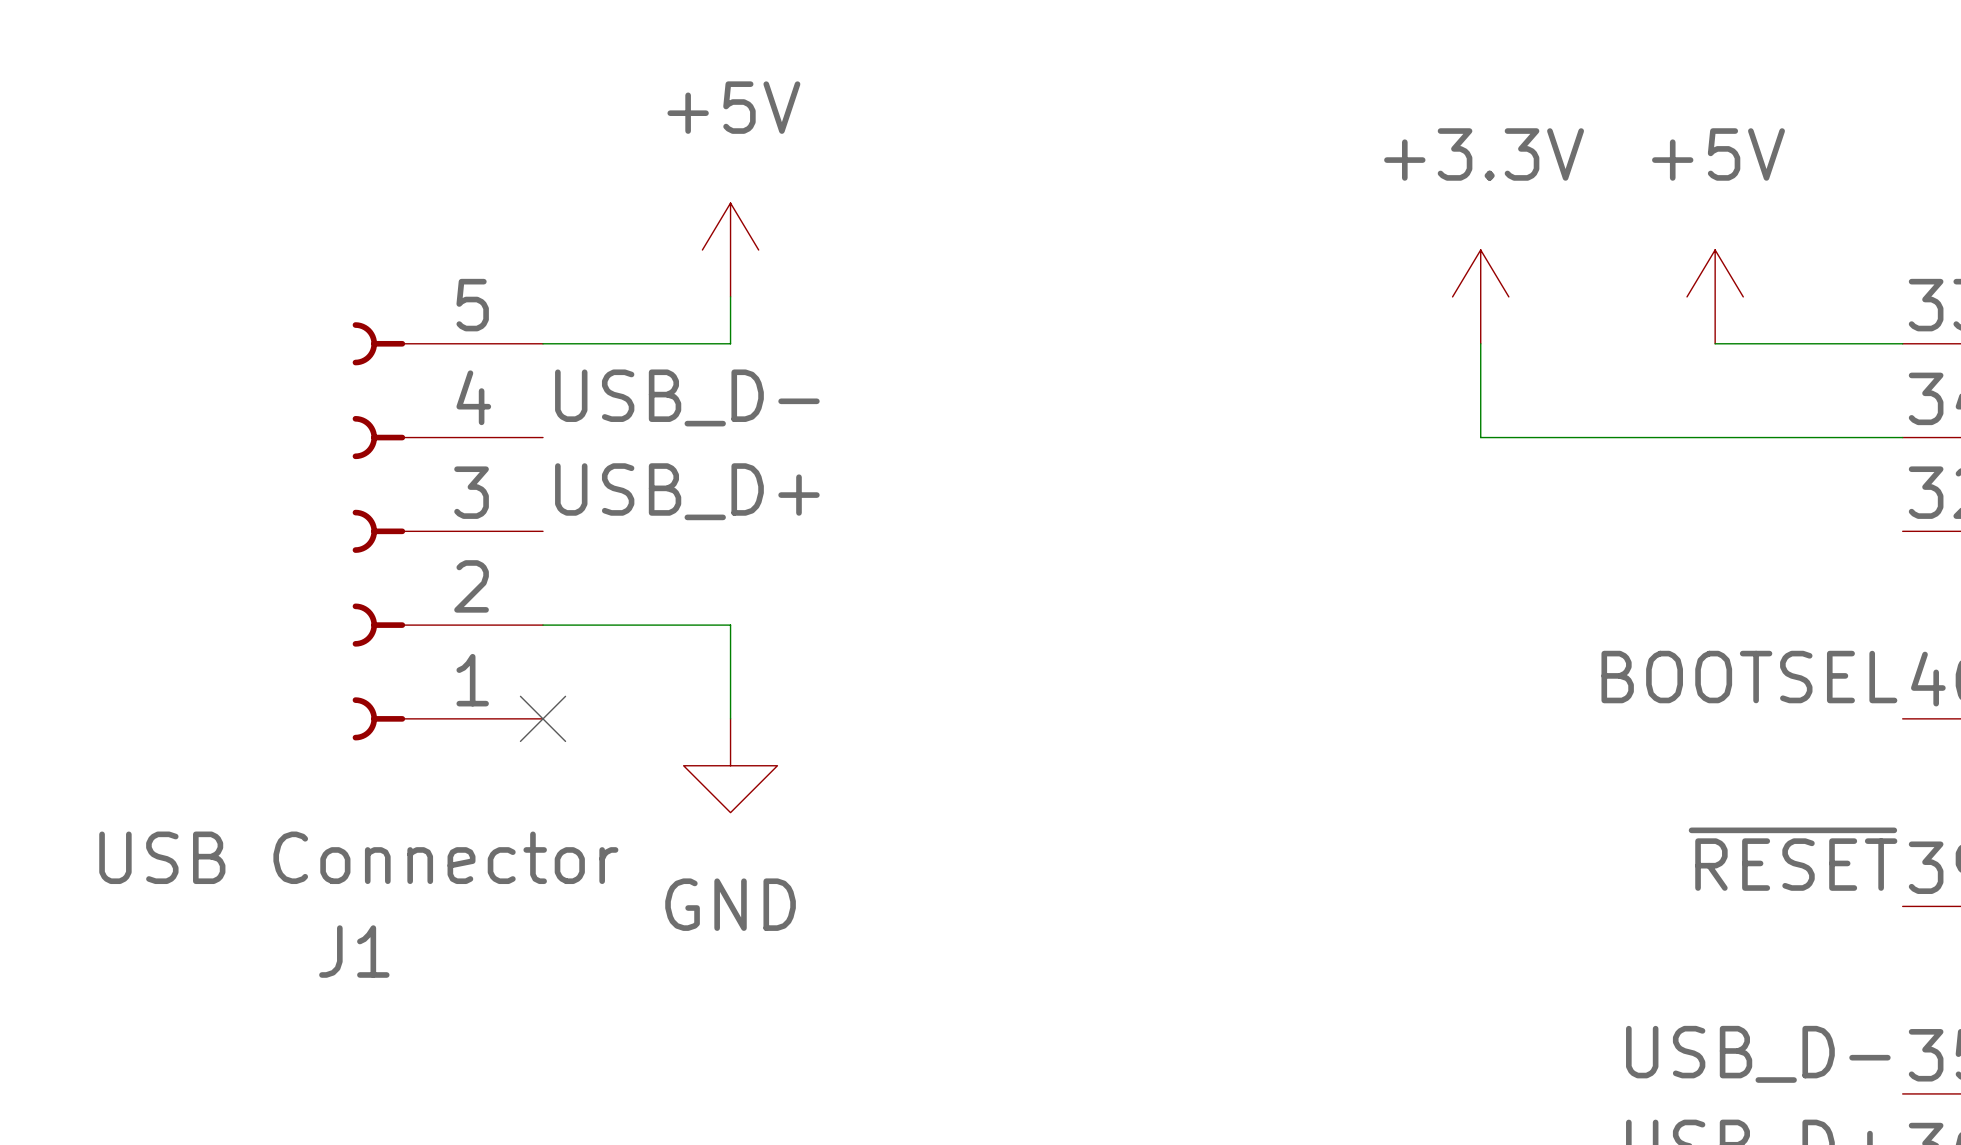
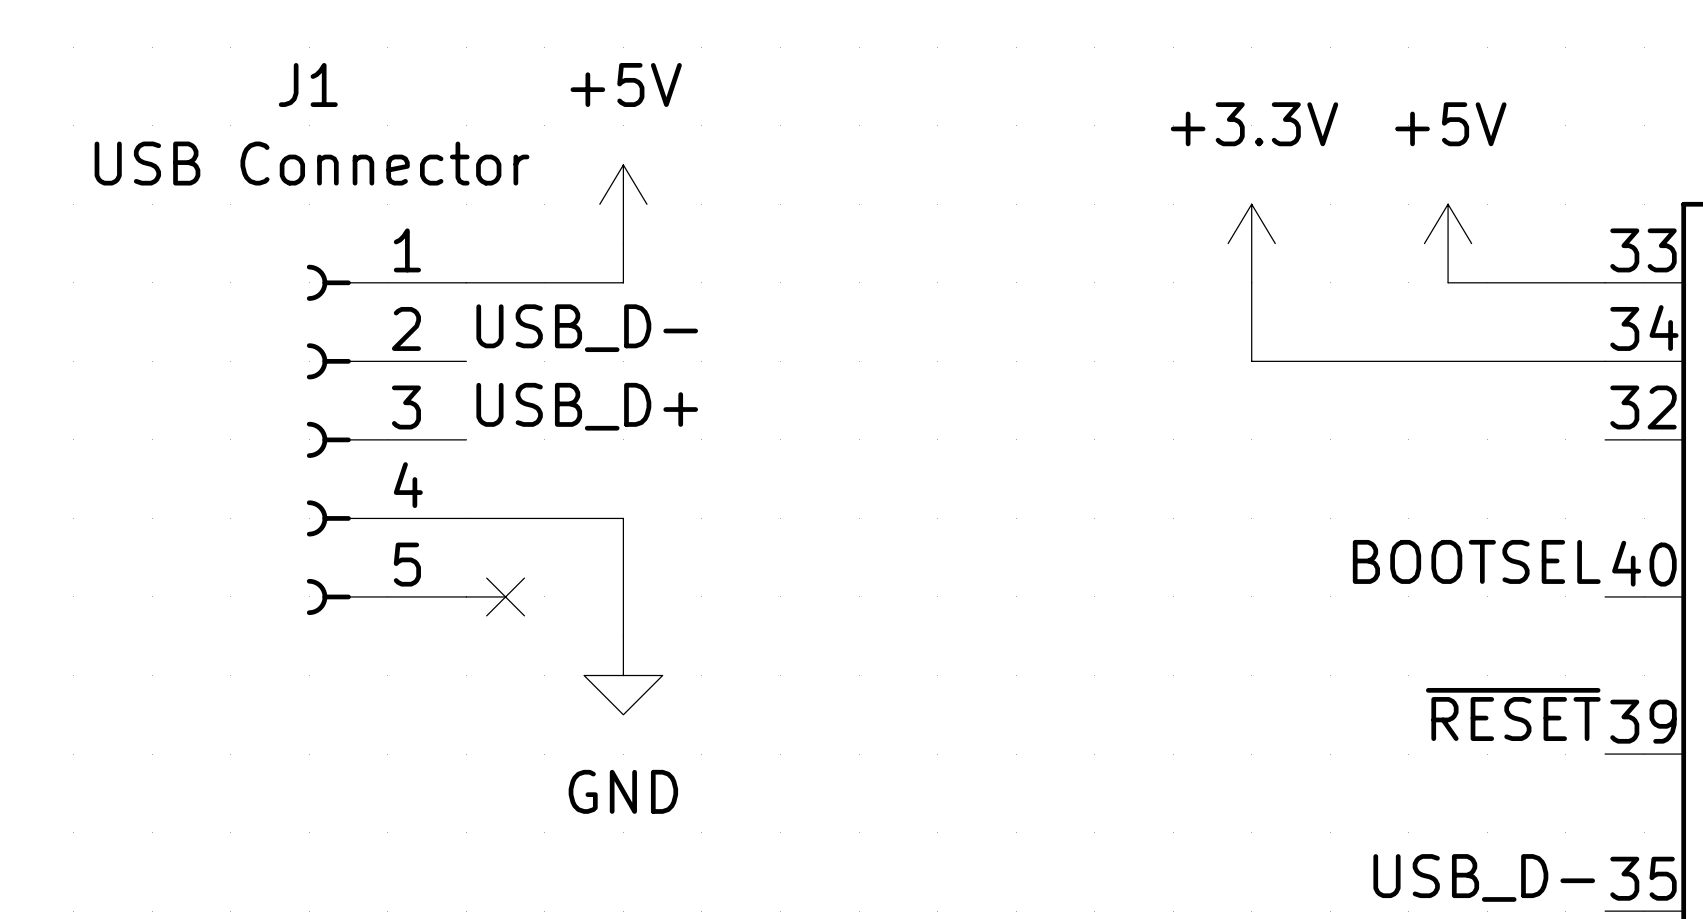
J1 flip: as is (378, 531) -> up-down (328, 439)
wire: none -> (466, 596) (505, 596)
no-connect mark position: (543, 718) -> (505, 596)
power symbol position: GND (730, 765) -> GND (623, 675)

